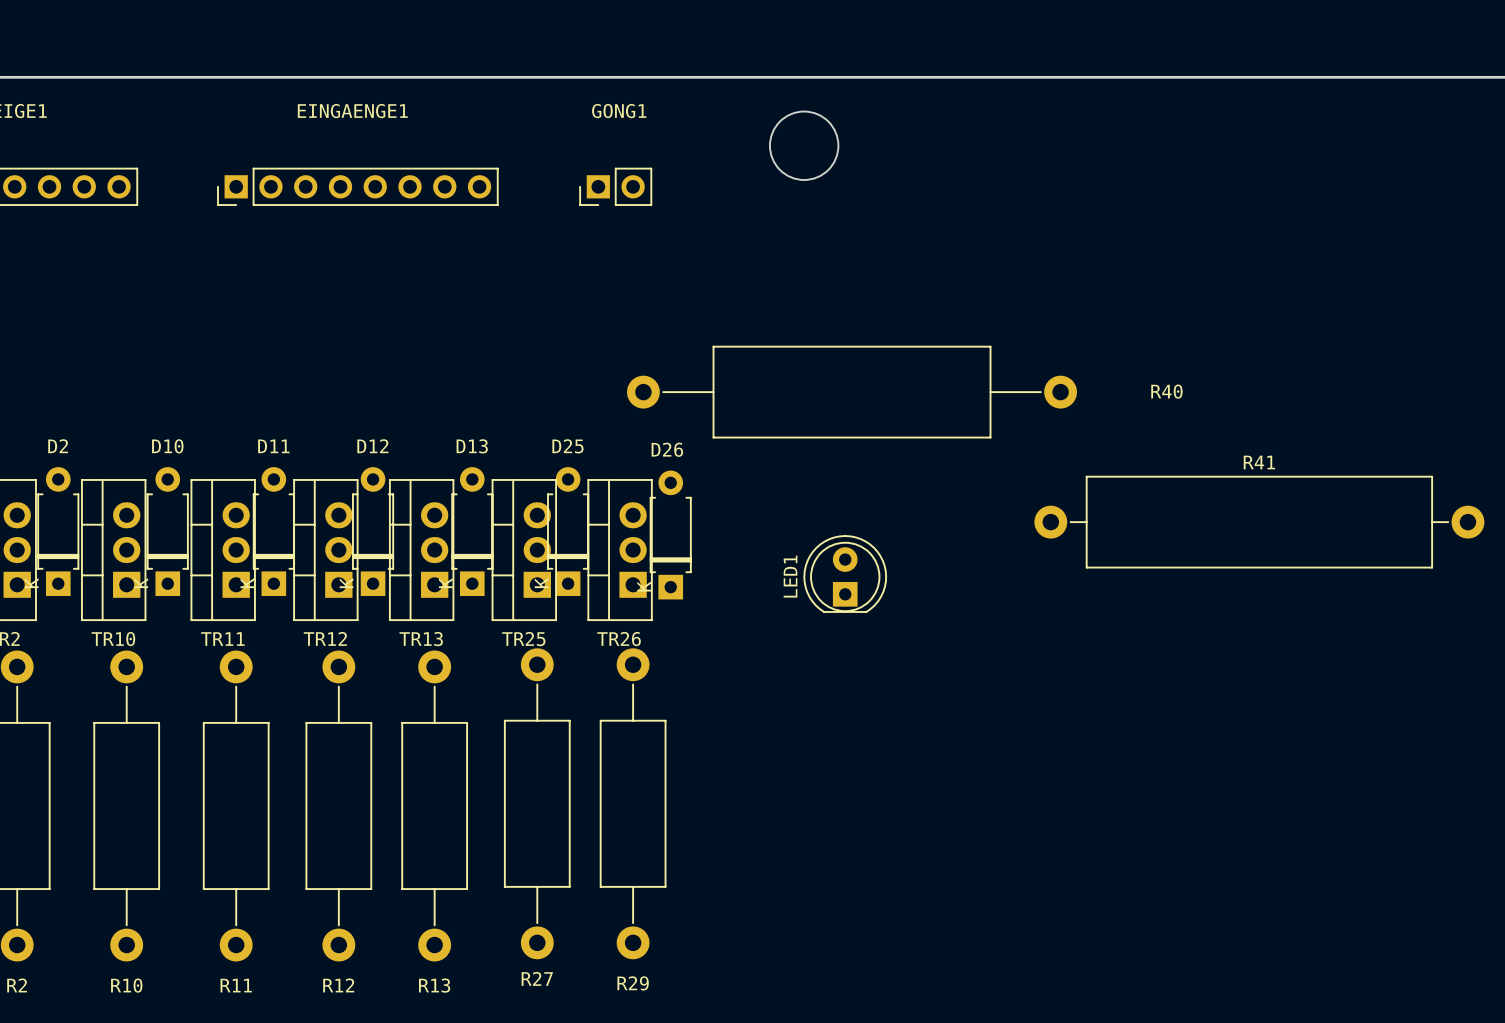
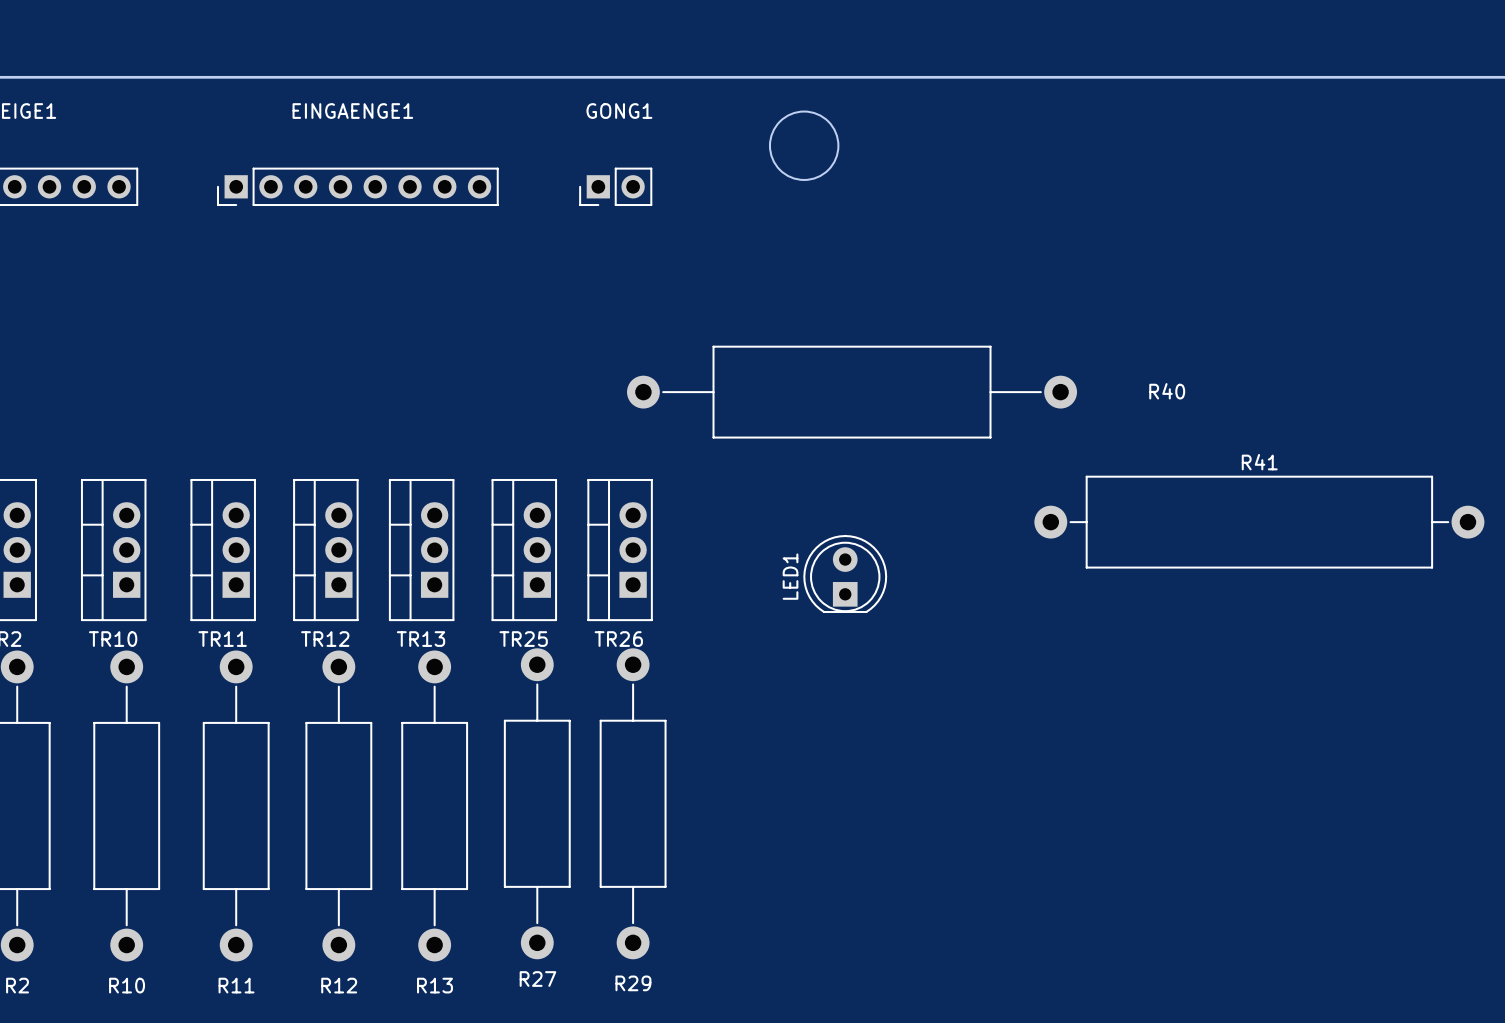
D2: (58, 531) -> none
D10: (167, 531) -> none
D11: (273, 531) -> none
D12: (373, 531) -> none
D13: (472, 531) -> none
D25: (568, 531) -> none
D26: (670, 534) -> none

